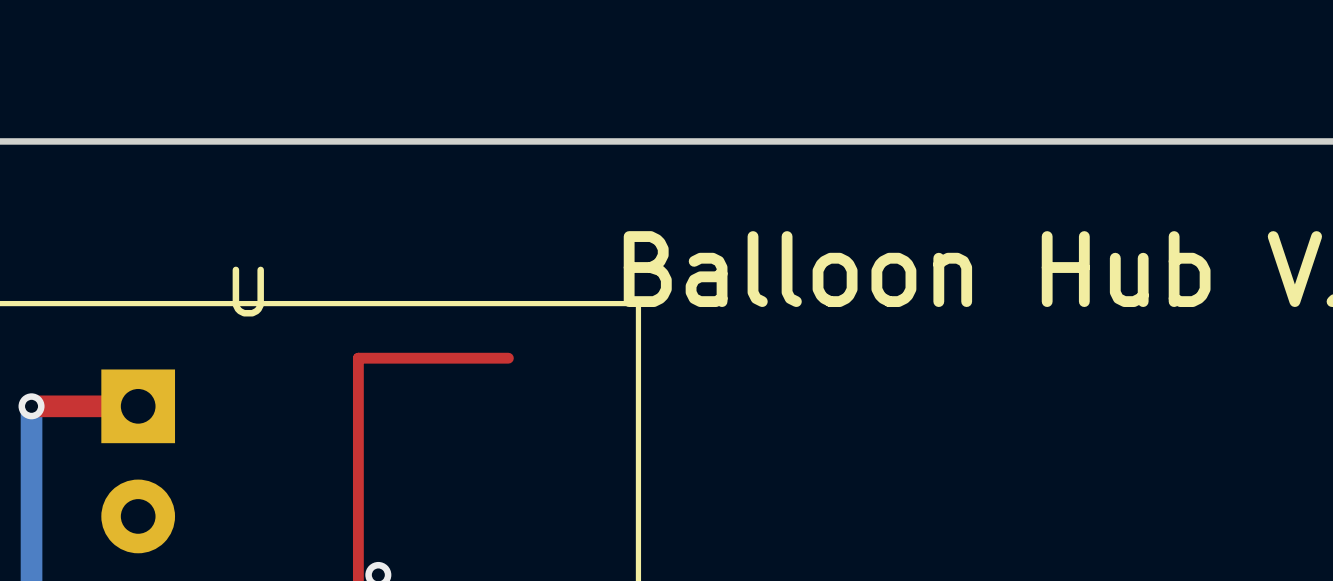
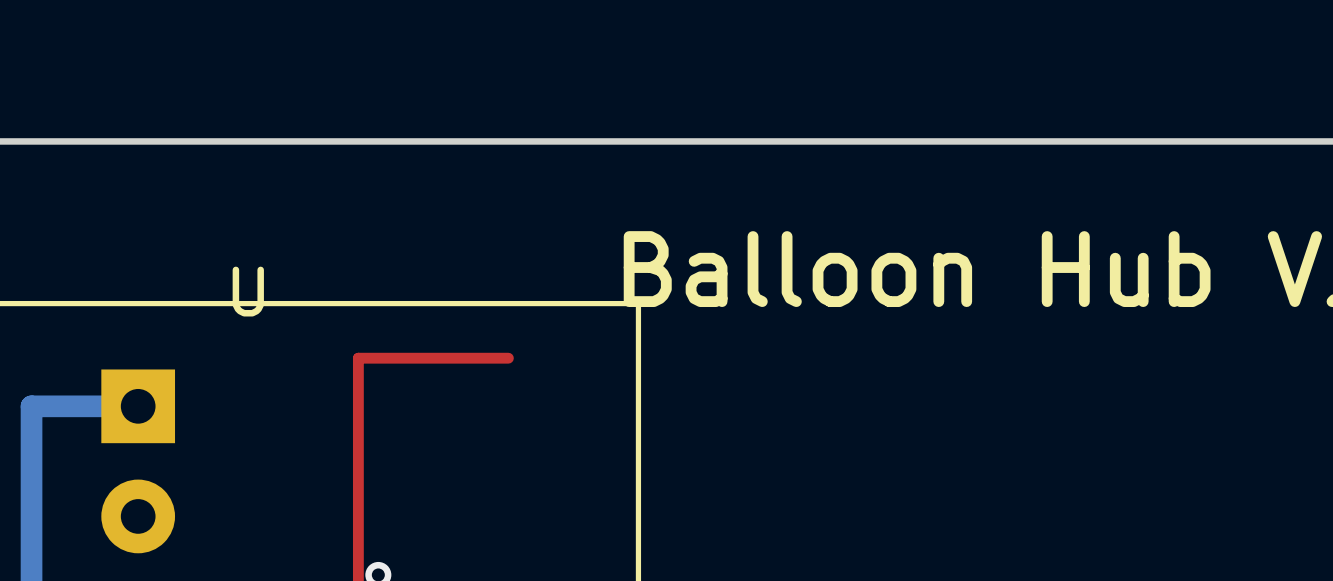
bottom track: none -> (31, 406) (138, 406)
top track: (31, 406) (138, 406) -> none
via: (31, 406) -> none

